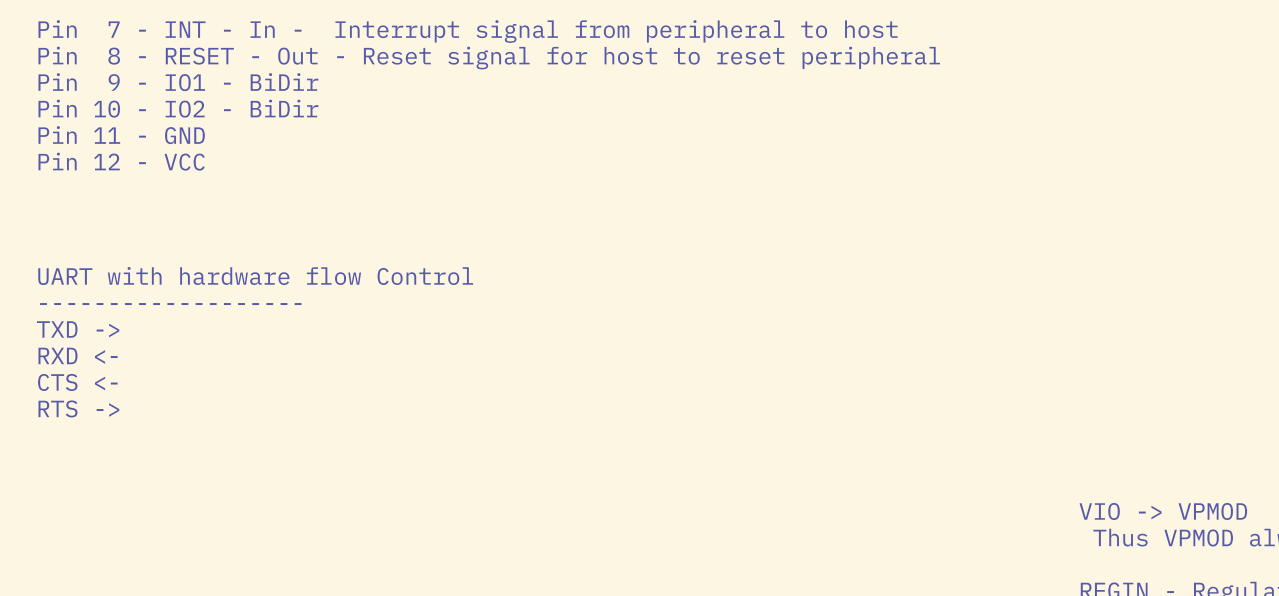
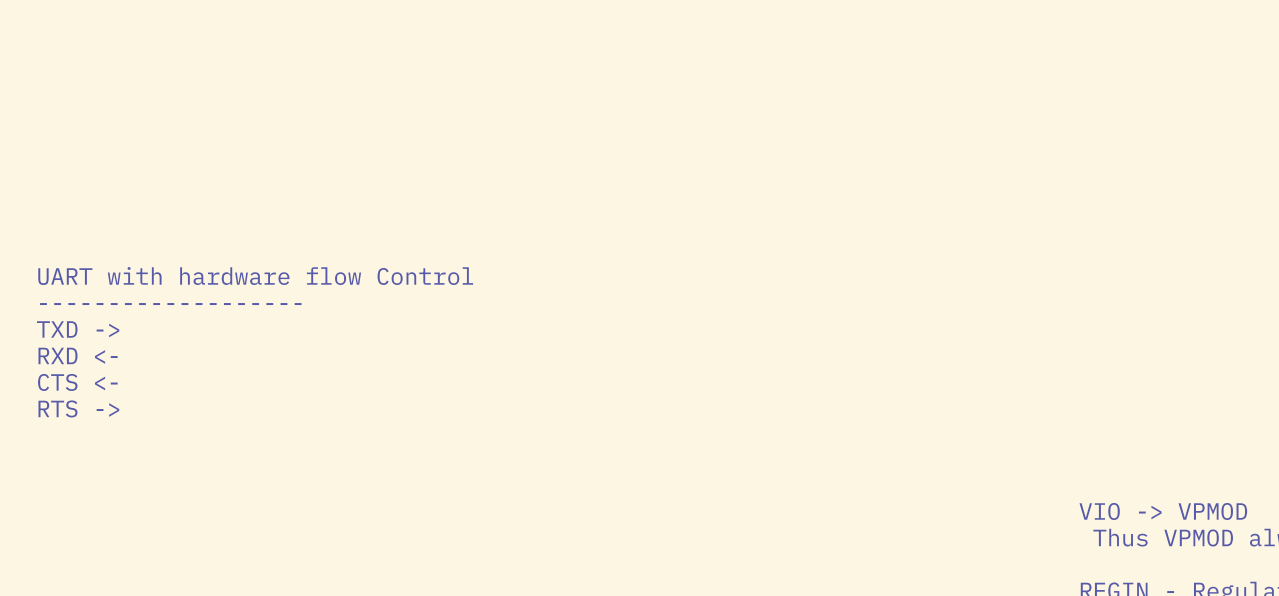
text: Pin 7 - INT - In - Interrupt signal from peripheral to host (468, 31) -> none
text: Pin 8 - RESET - Out - Reset signal for host to reset peripheral (489, 58) -> none
text: Pin 9 - IO1 - BiDir (178, 82) -> none
text: Pin 10 - IO2 - BiDir (178, 108) -> none
text: Pin 11 - GND (121, 135) -> none
text: Pin 12 - VCC (121, 161) -> none

